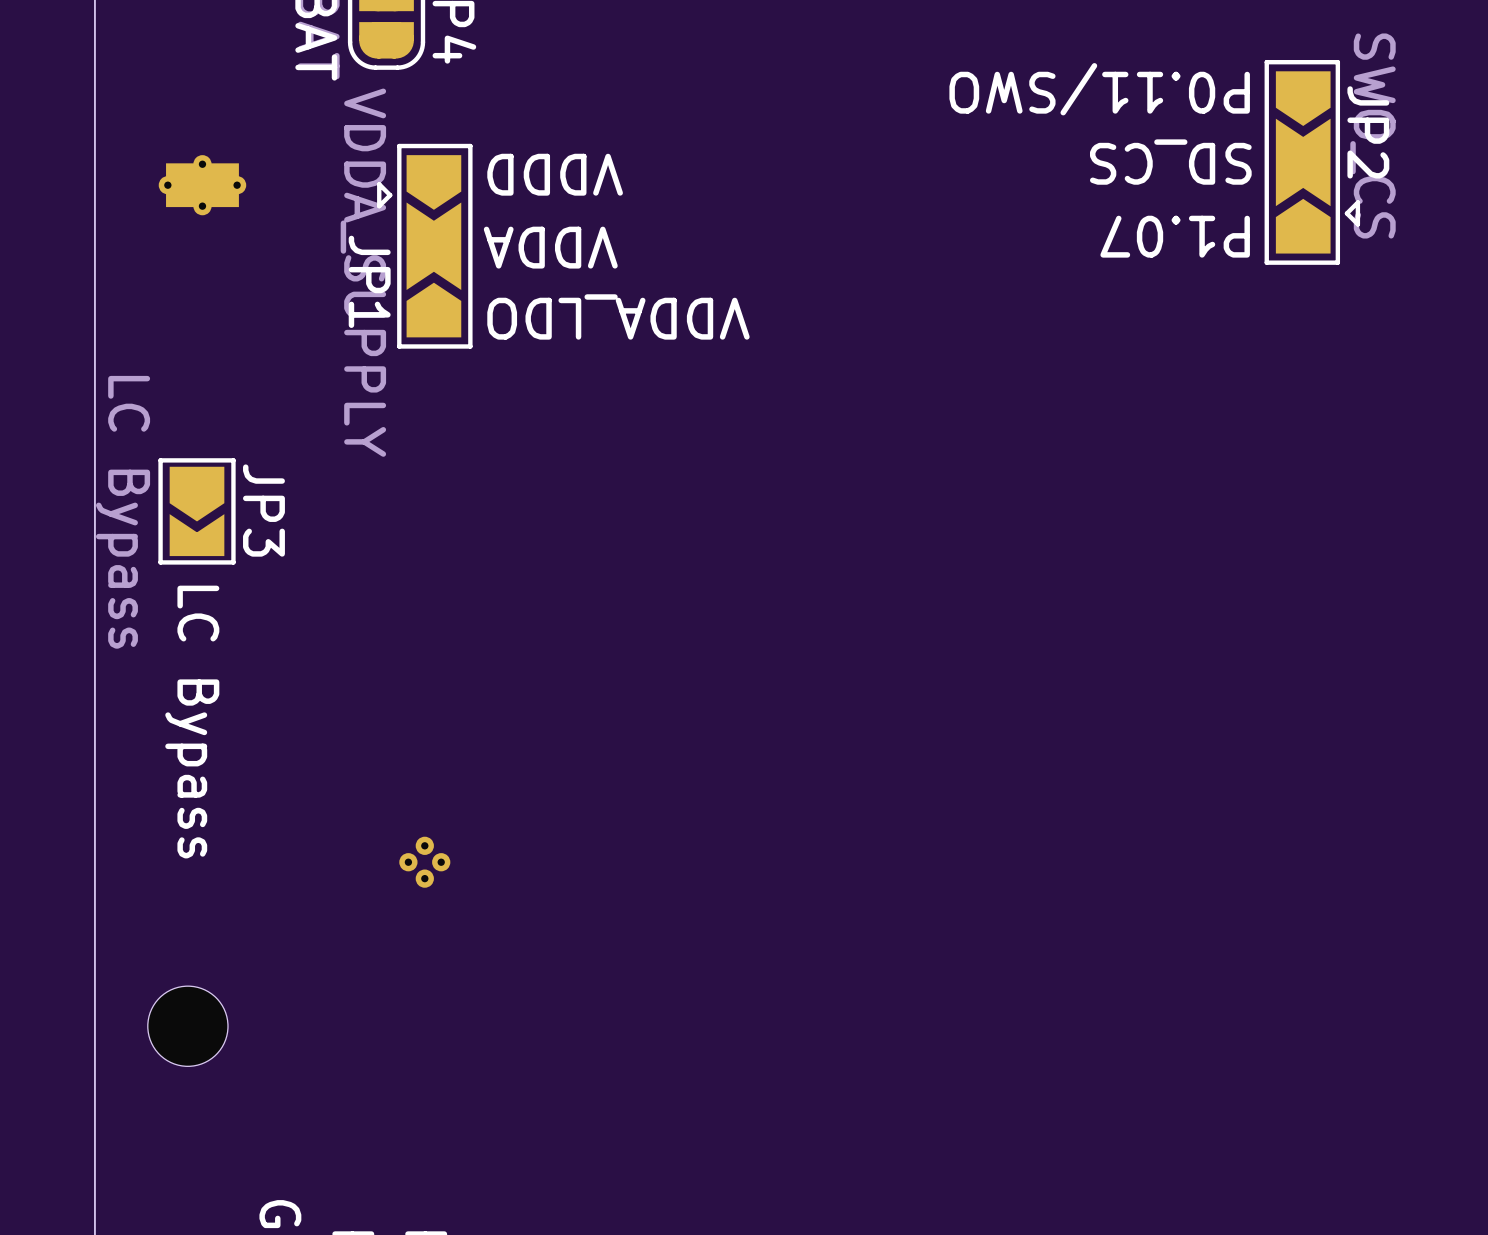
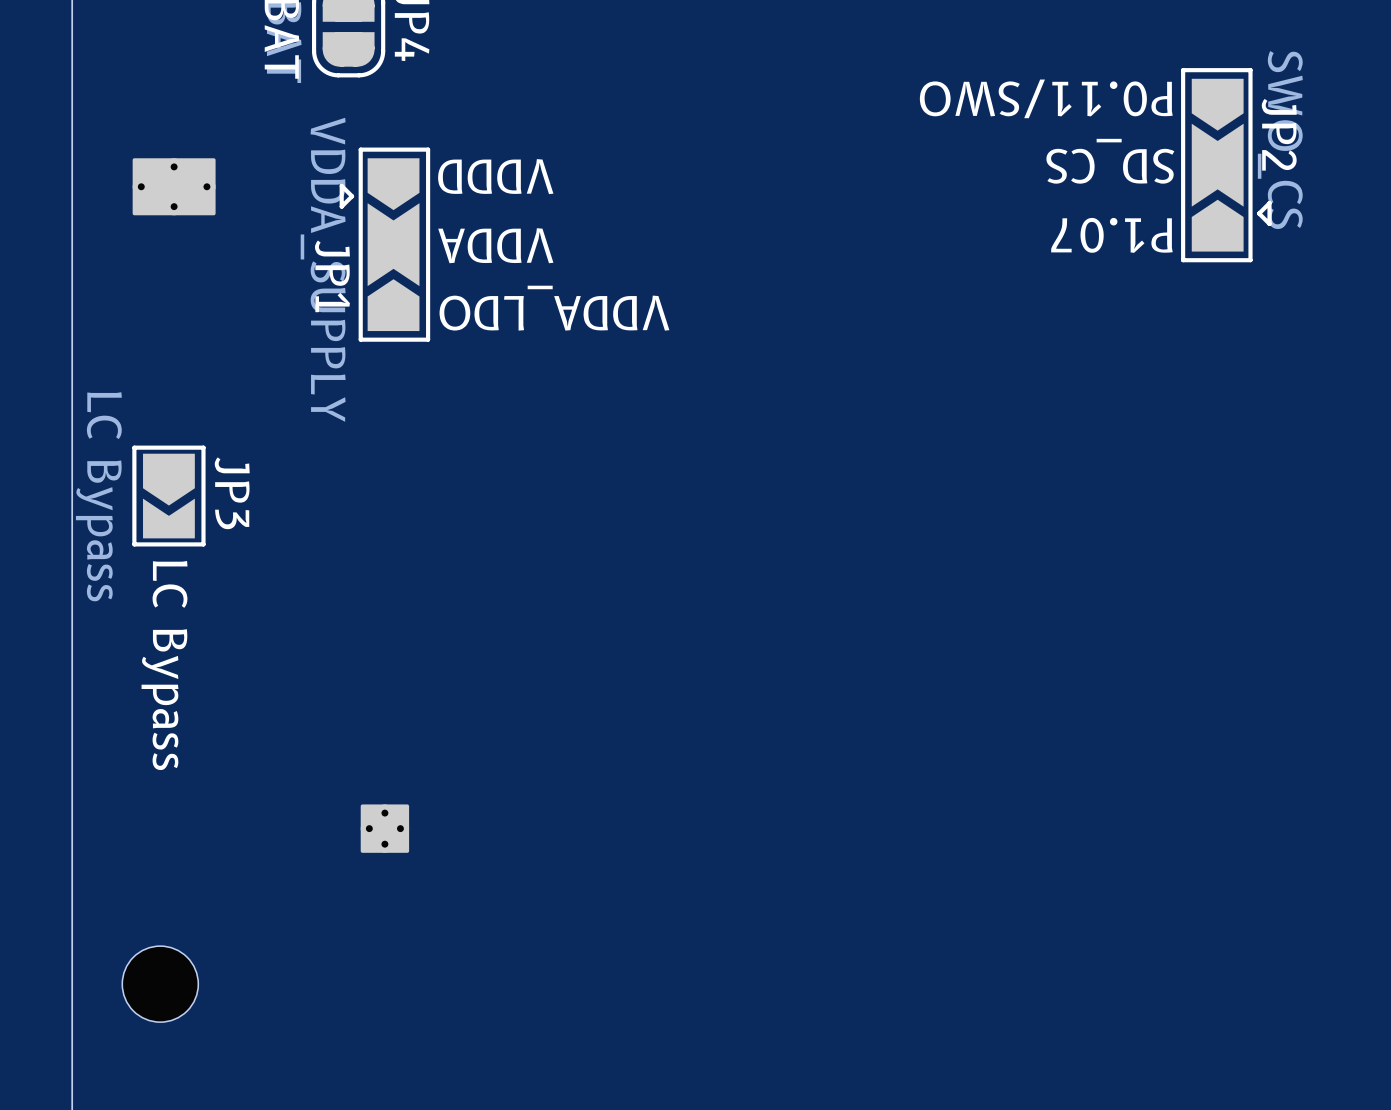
part footprint: [158, 155, 247, 216] -> [132, 158, 216, 216]
part footprint: [399, 836, 451, 888] -> [360, 804, 410, 853]

